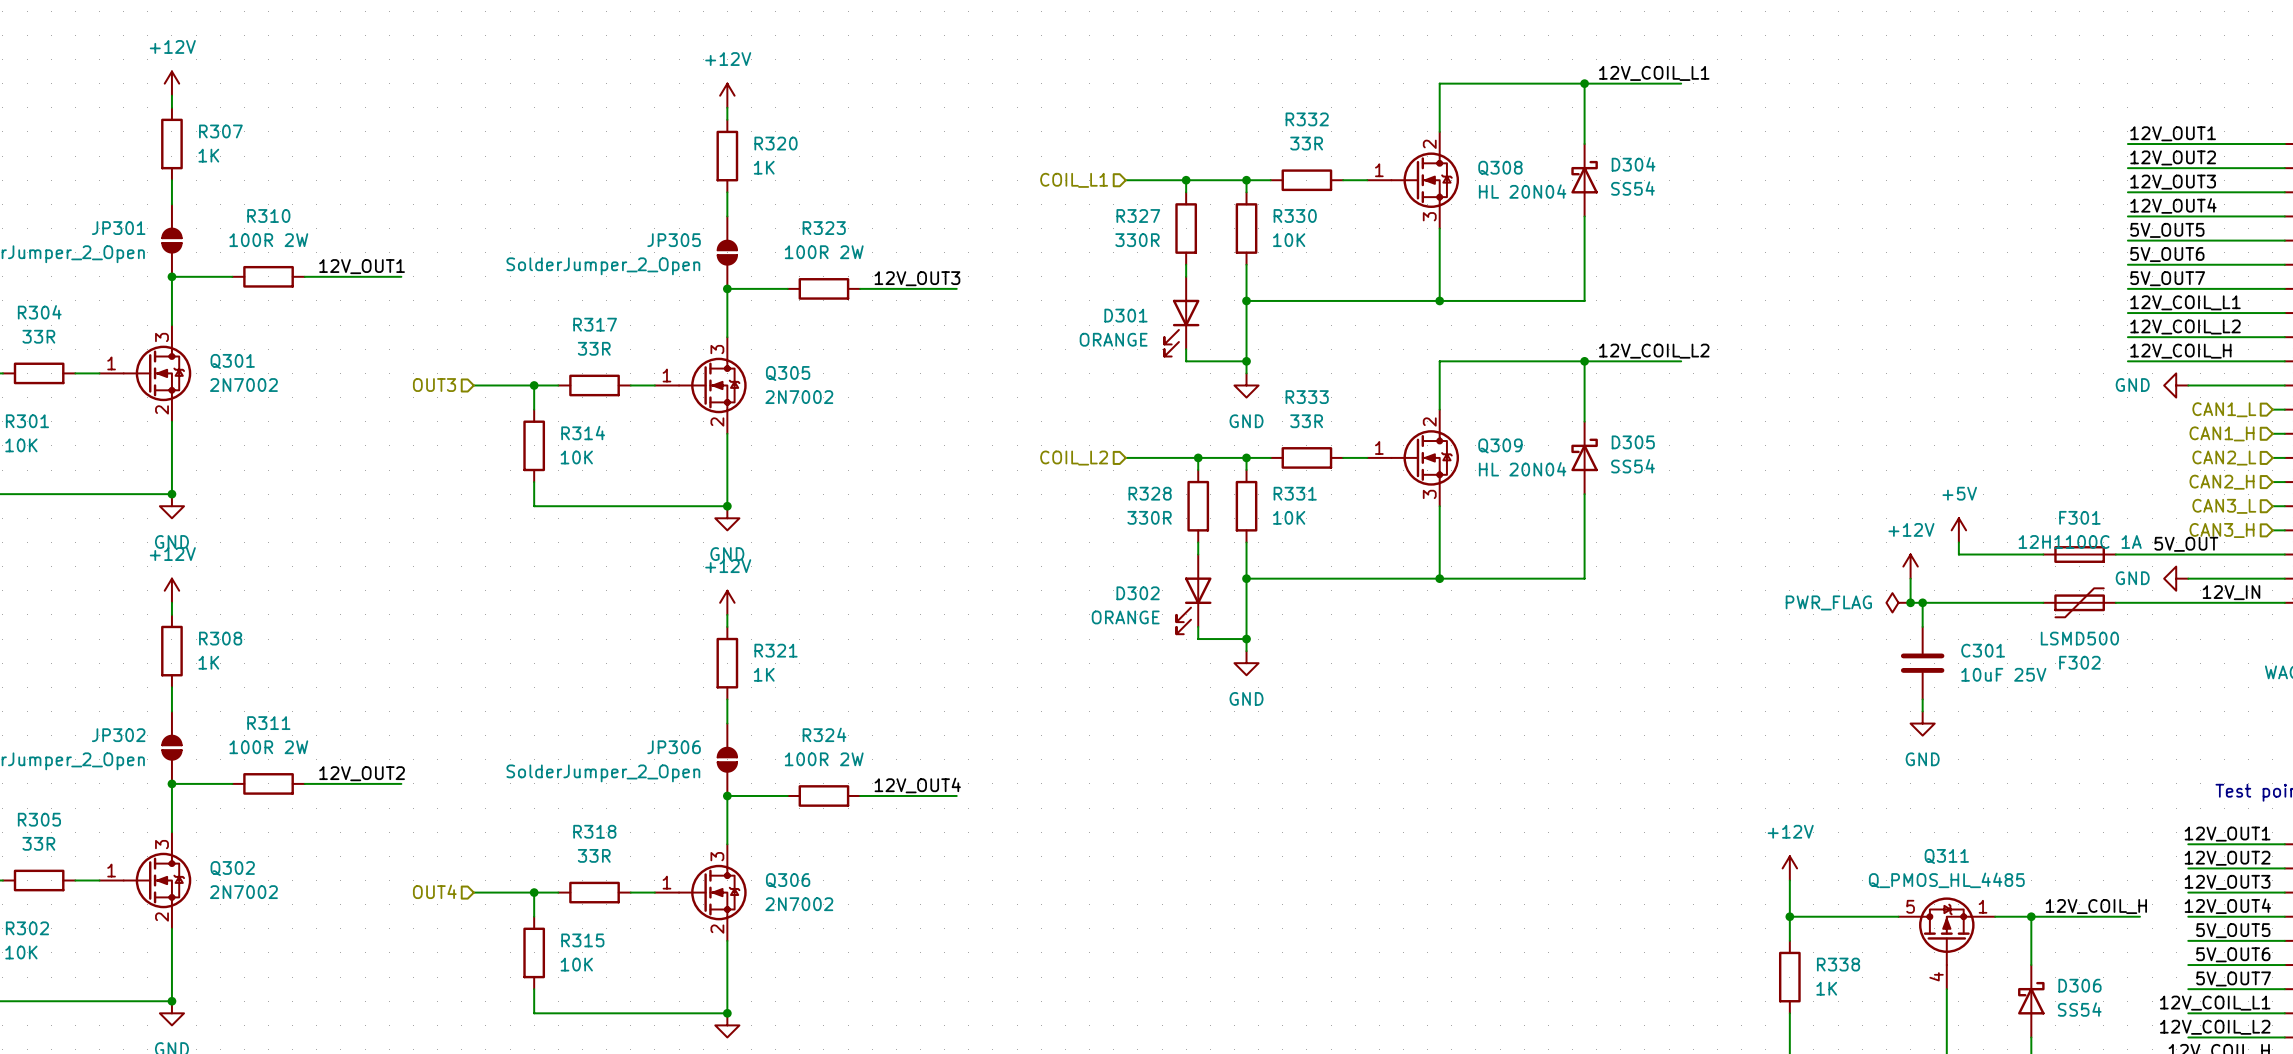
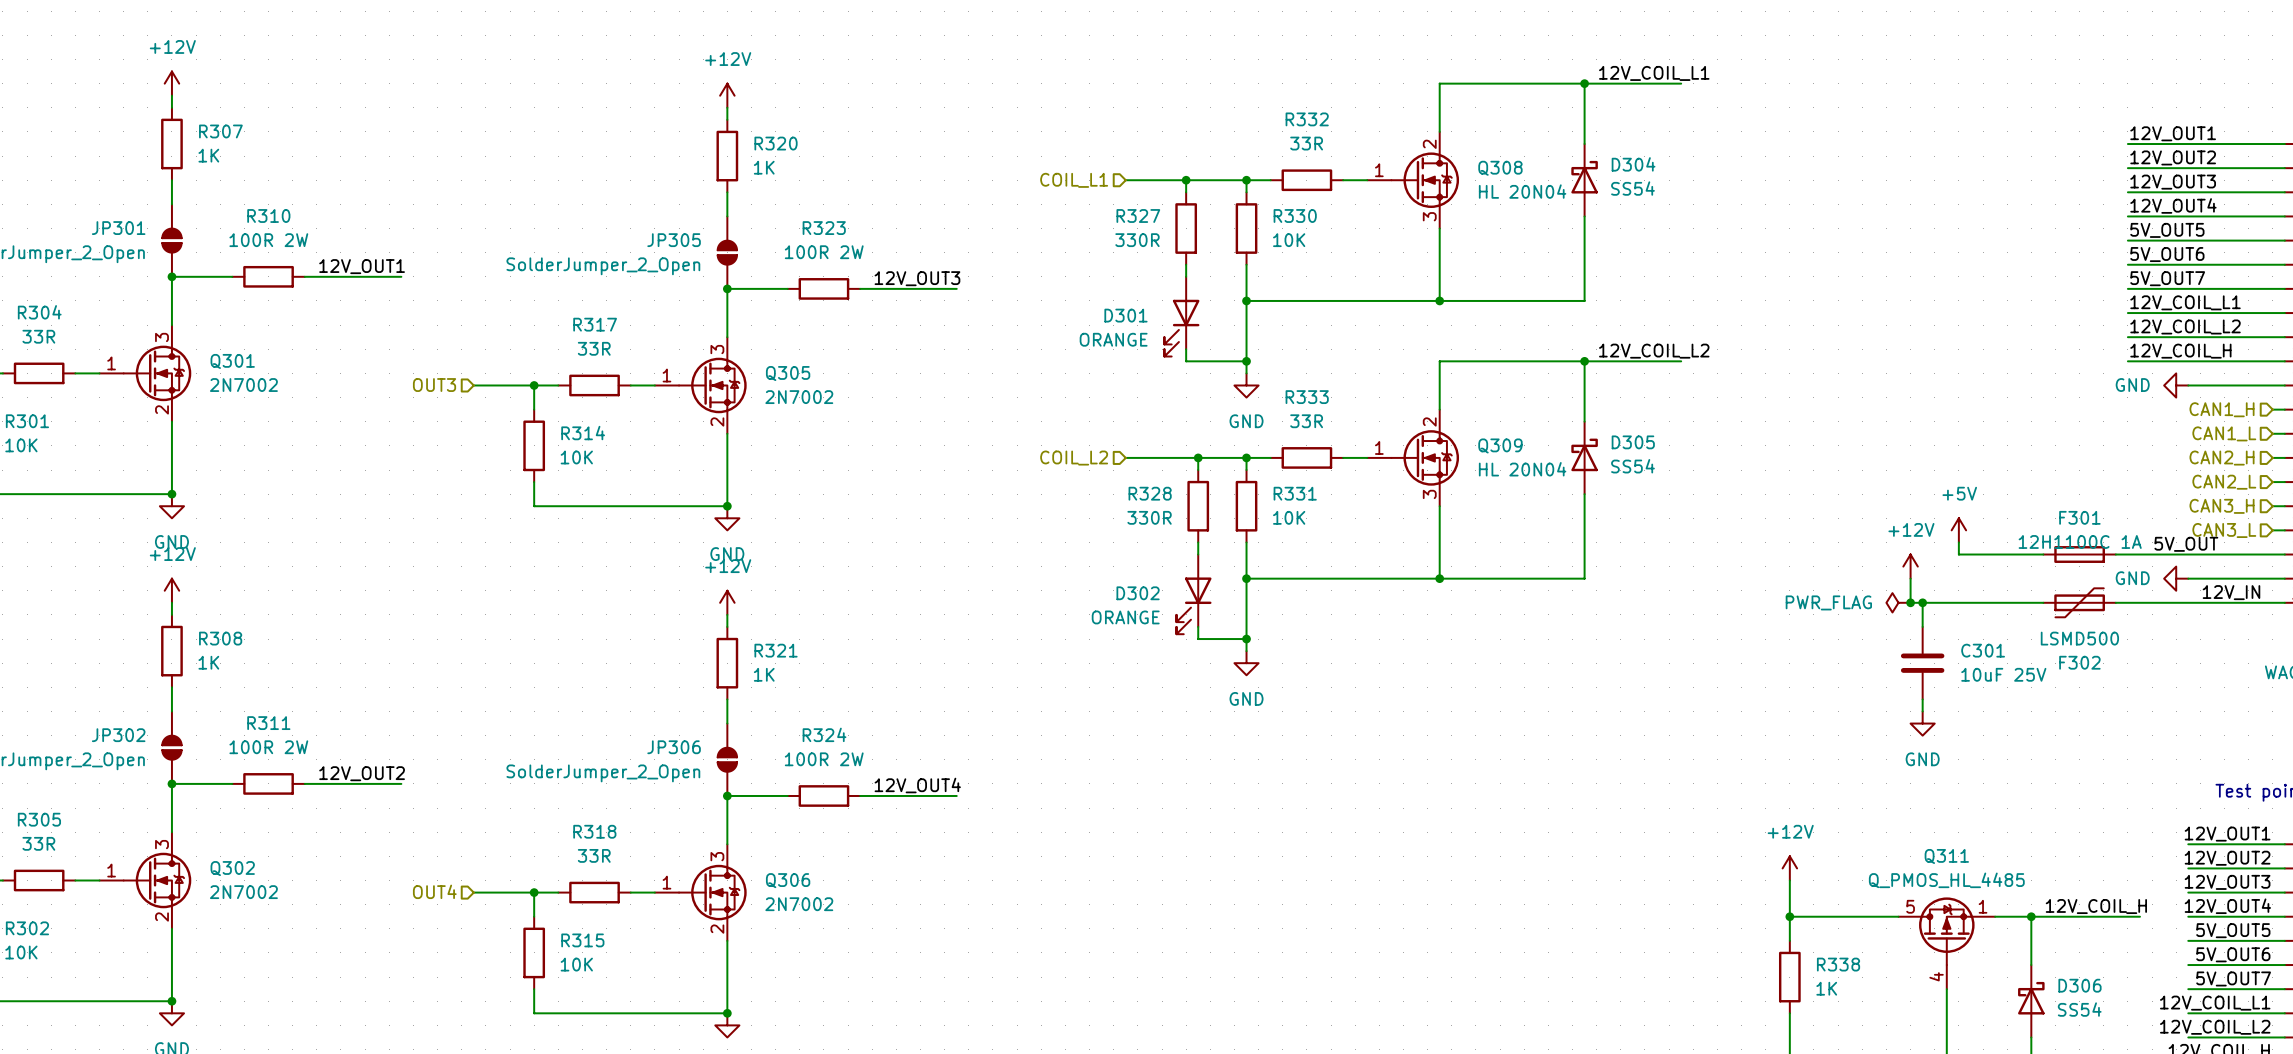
hierarchical label: CAN1_L (2224, 409) -> CAN1_H (2222, 409)
hierarchical label: CAN1_H (2222, 433) -> CAN1_L (2224, 433)
hierarchical label: CAN2_L (2224, 458) -> CAN2_H (2222, 458)
hierarchical label: CAN2_H (2222, 482) -> CAN2_L (2224, 482)
hierarchical label: CAN3_L (2224, 506) -> CAN3_H (2222, 506)
hierarchical label: CAN3_H (2222, 530) -> CAN3_L (2224, 530)

